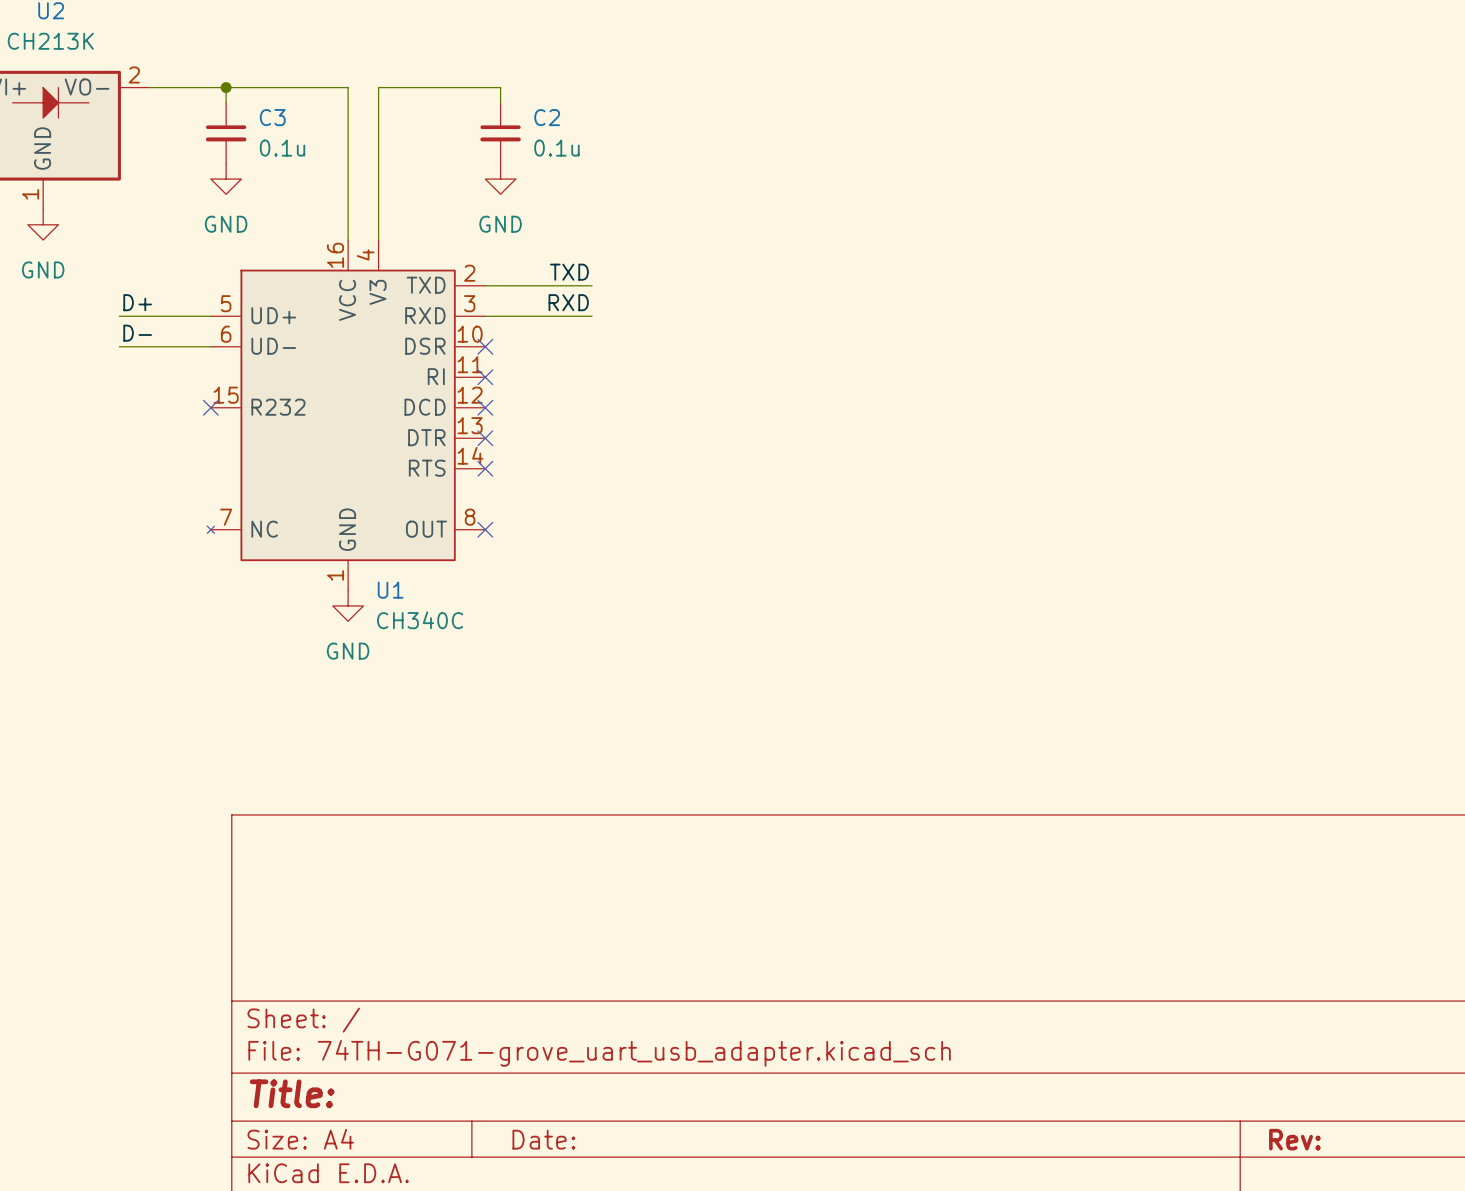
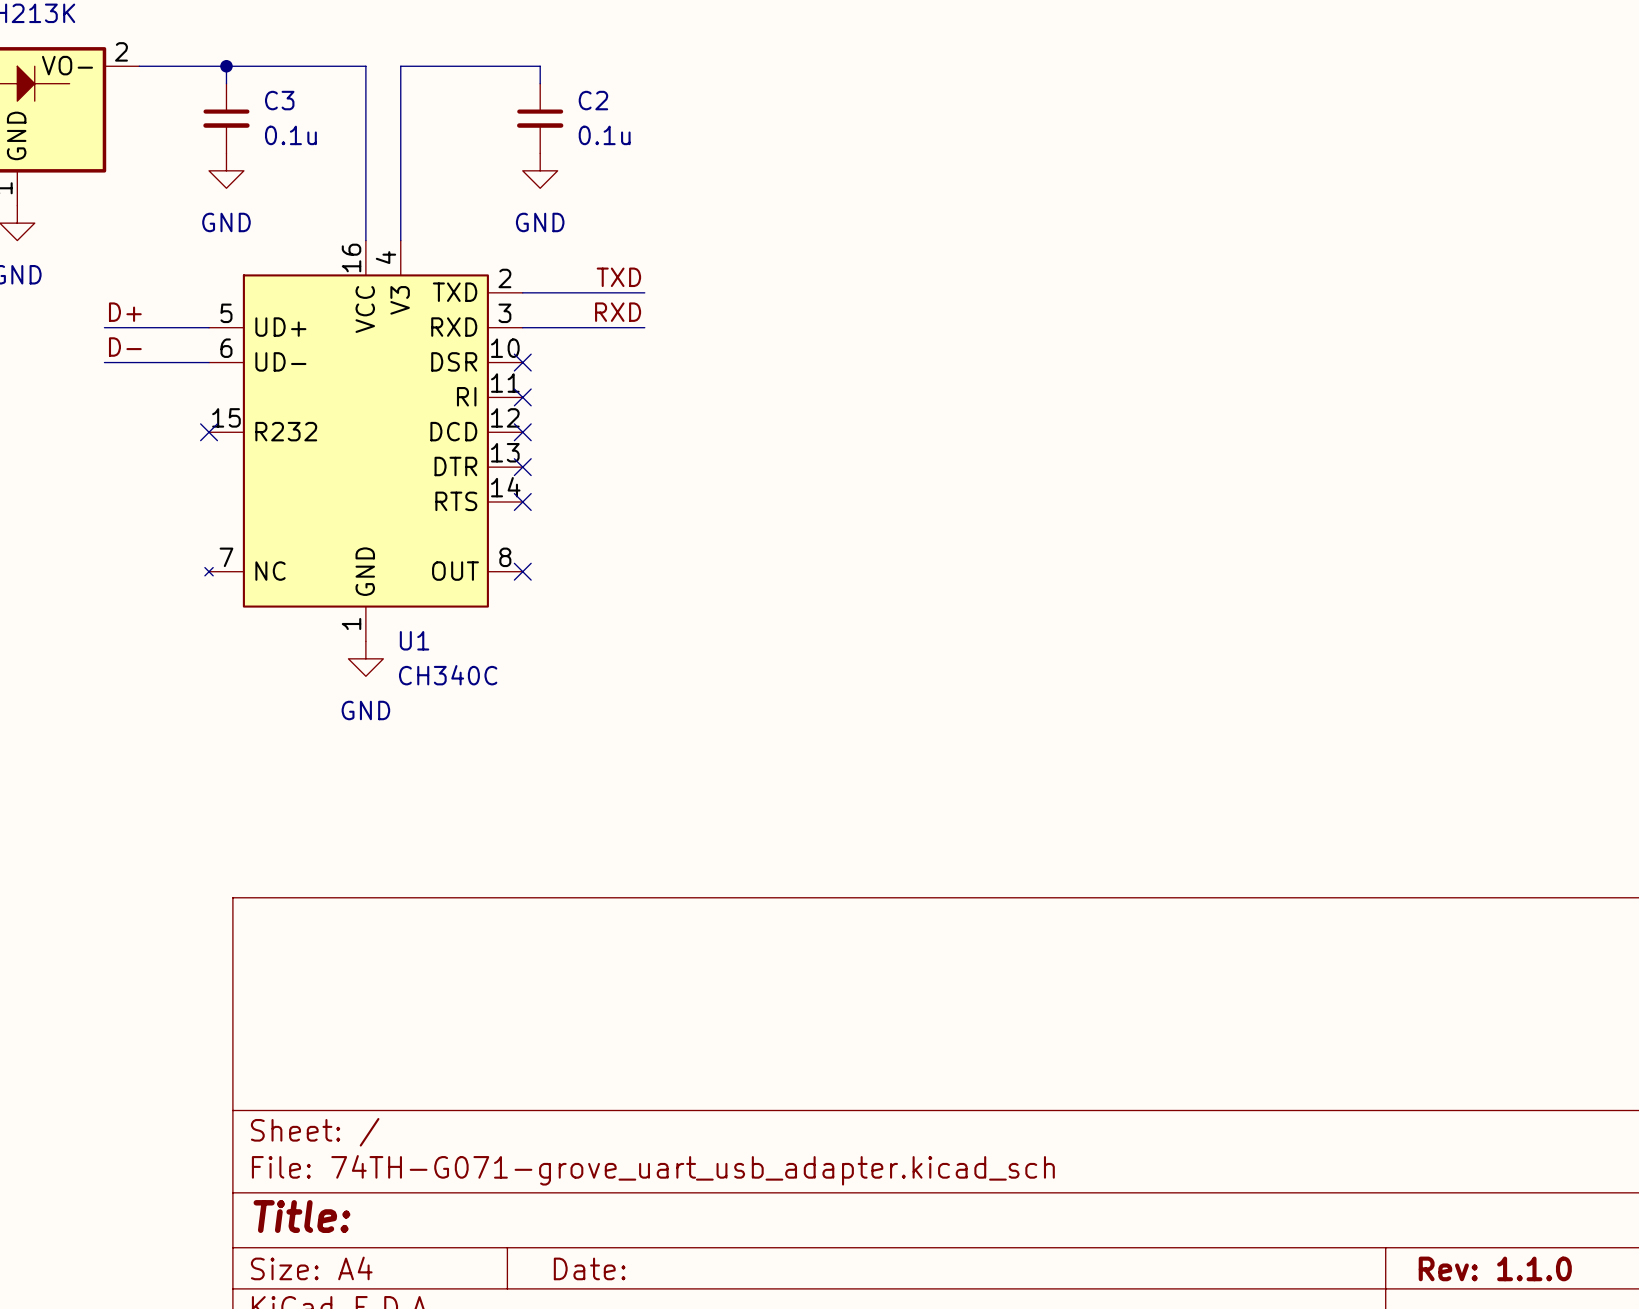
title block: Rev: (1294, 1139) -> Rev: 1.1.0 (1495, 1268)

